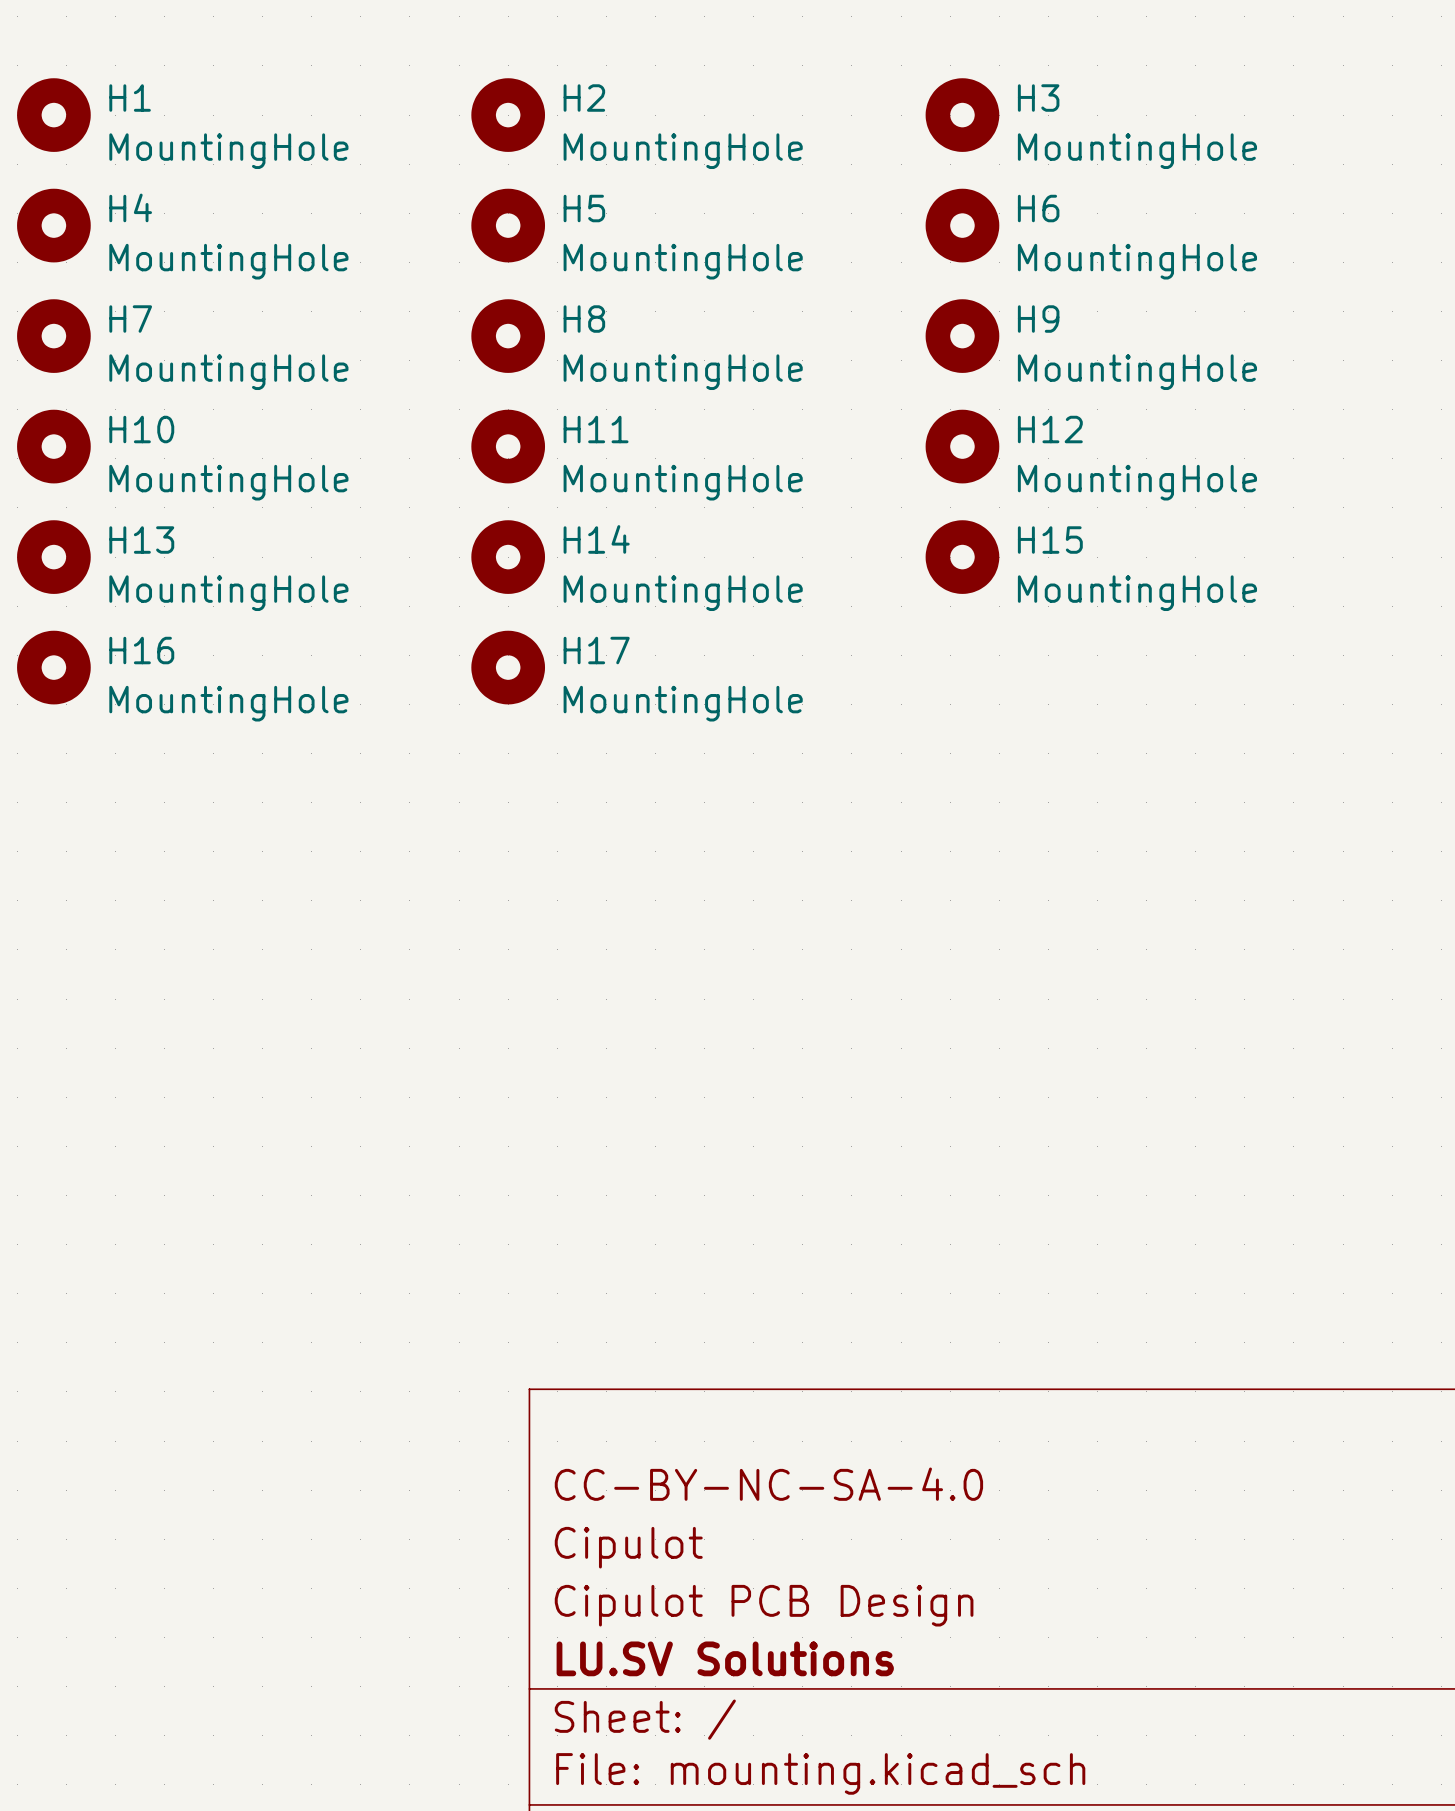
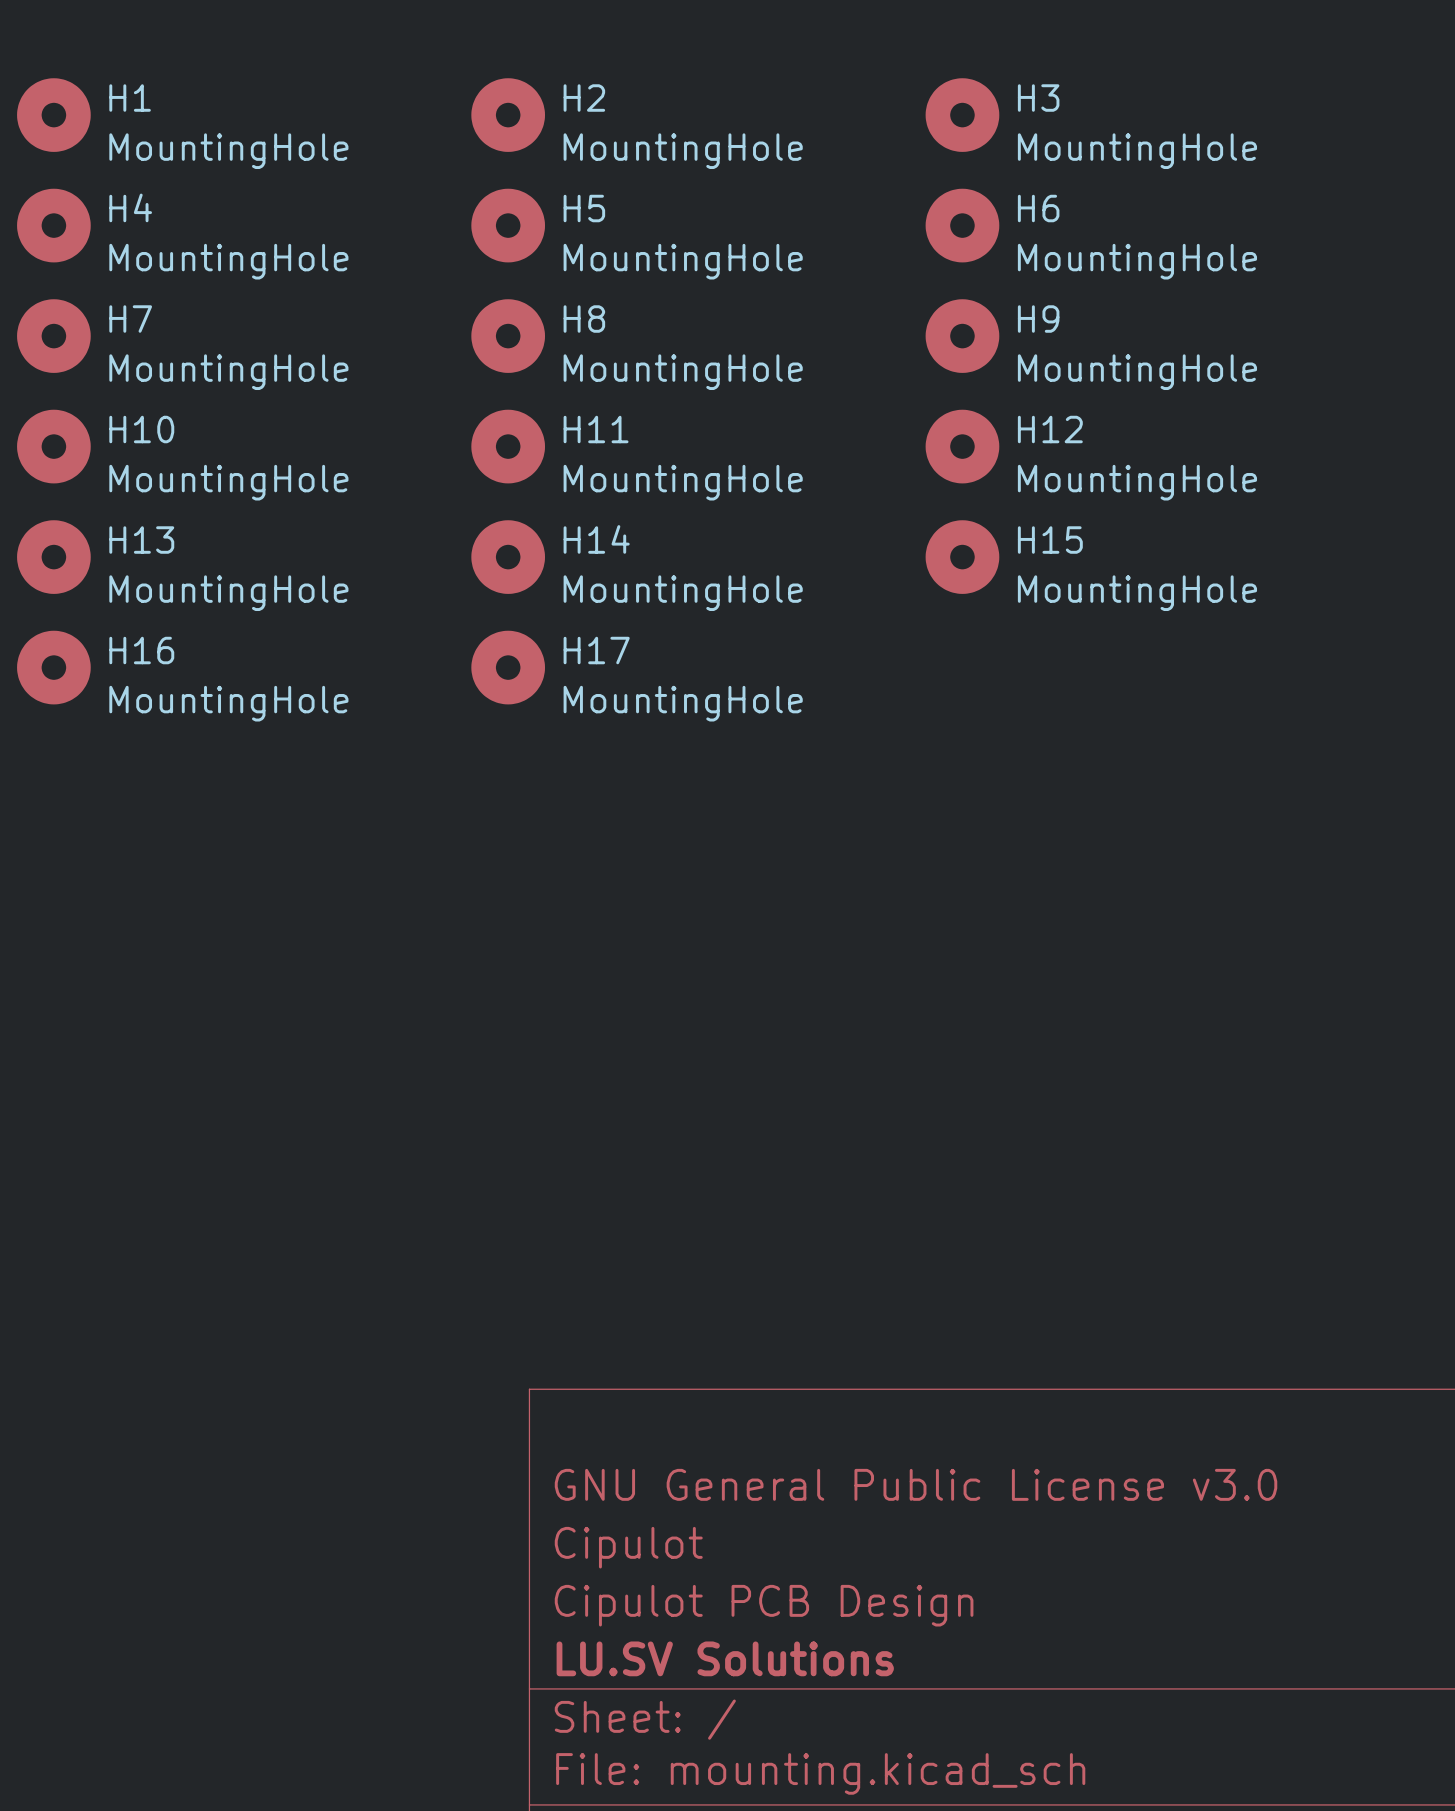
title block: CC-BY-NC-SA-4.0 (768, 1484) -> GNU General Public License v3.0 (916, 1484)

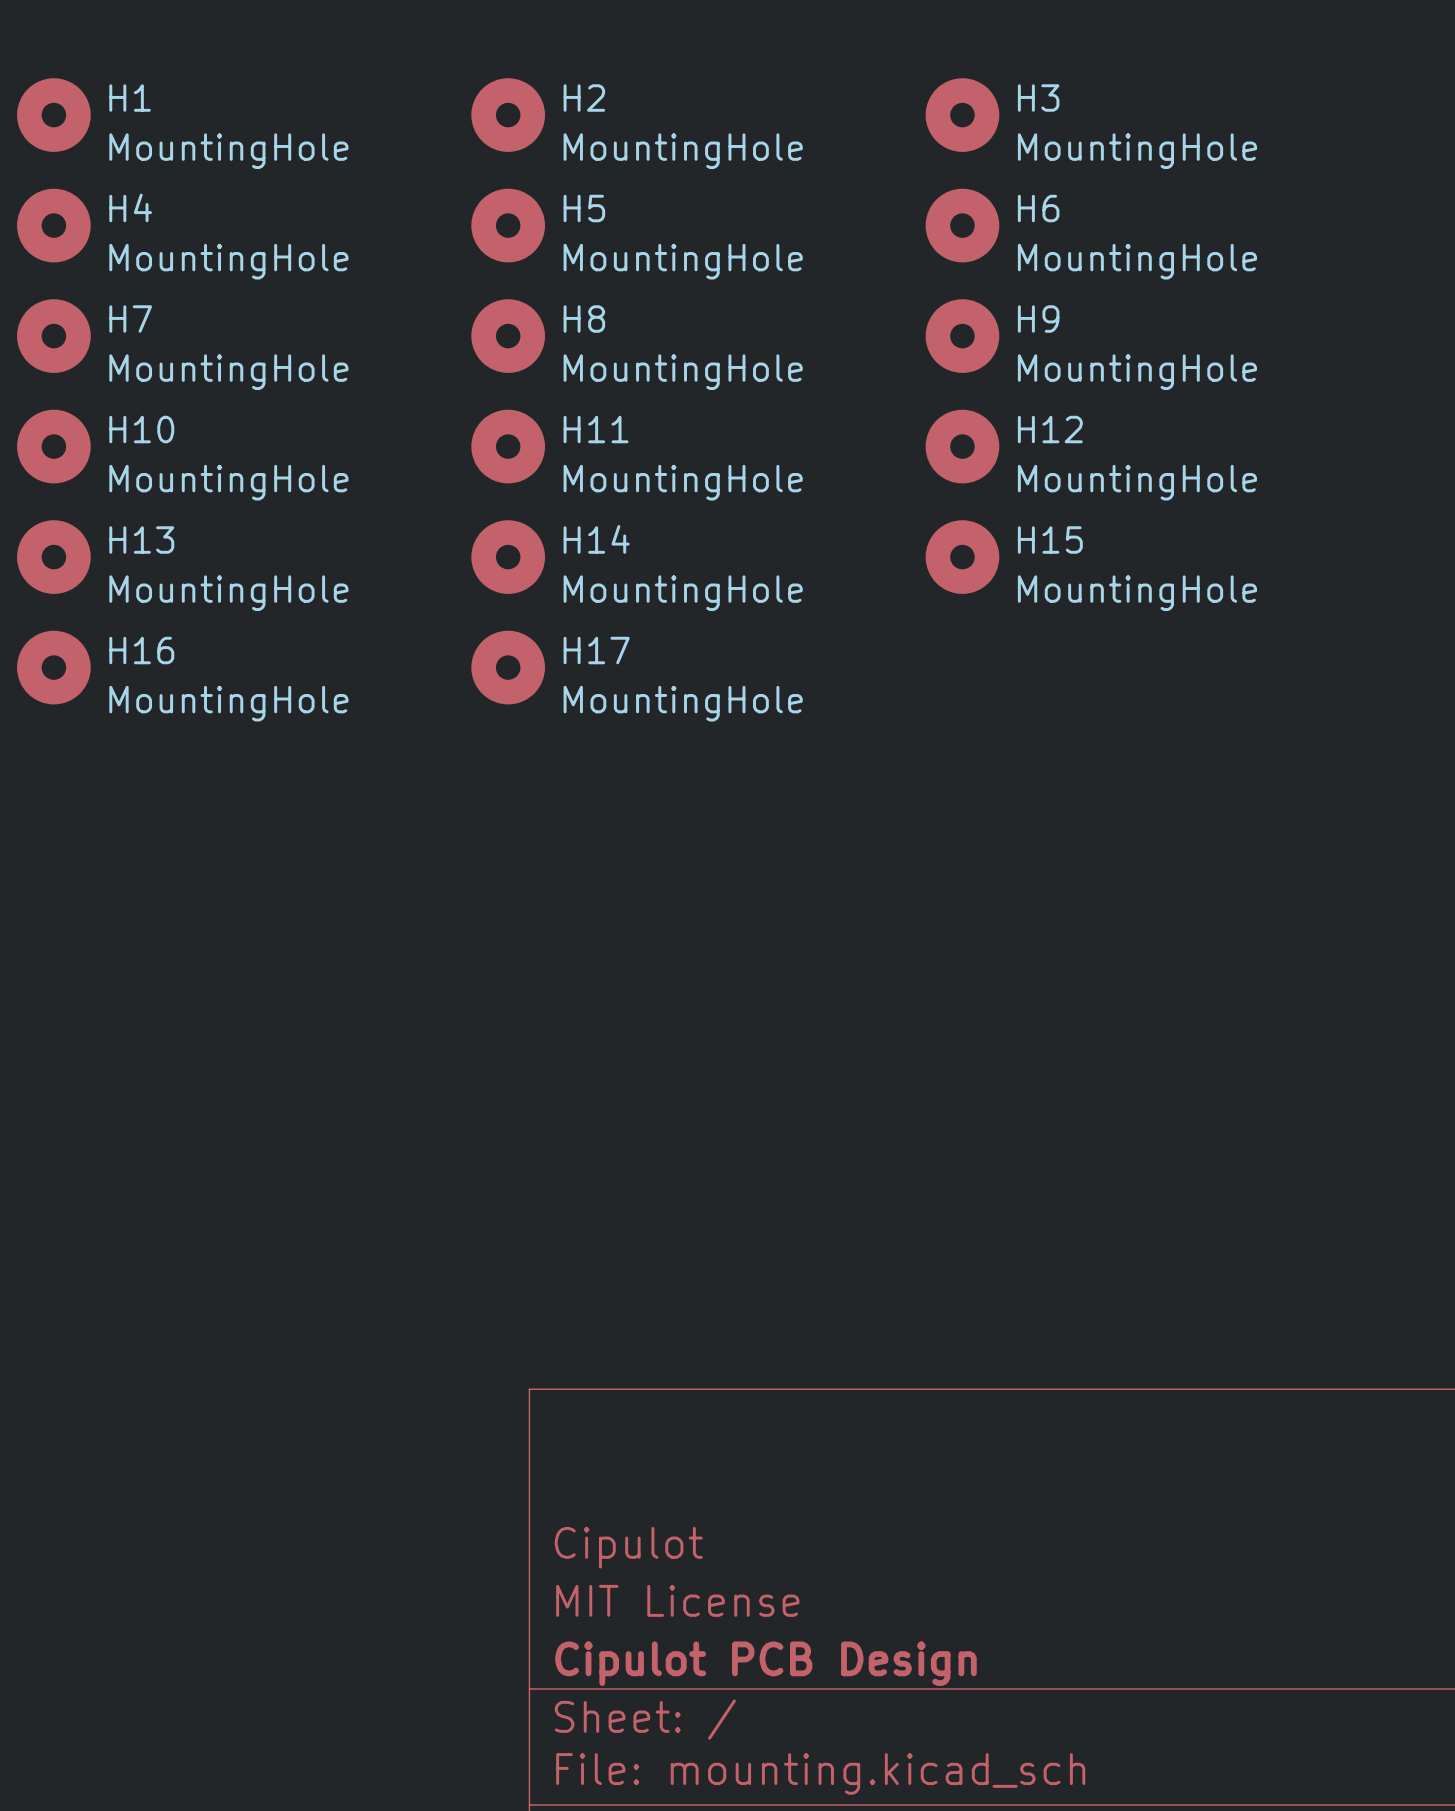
title block: GNU General Public License v3.0 (916, 1484) -> none
title block: Cipulot PCB Design (764, 1605) -> MIT License (677, 1600)
title block: LU.SV Solutions (725, 1658) -> Cipulot PCB Design (765, 1663)

